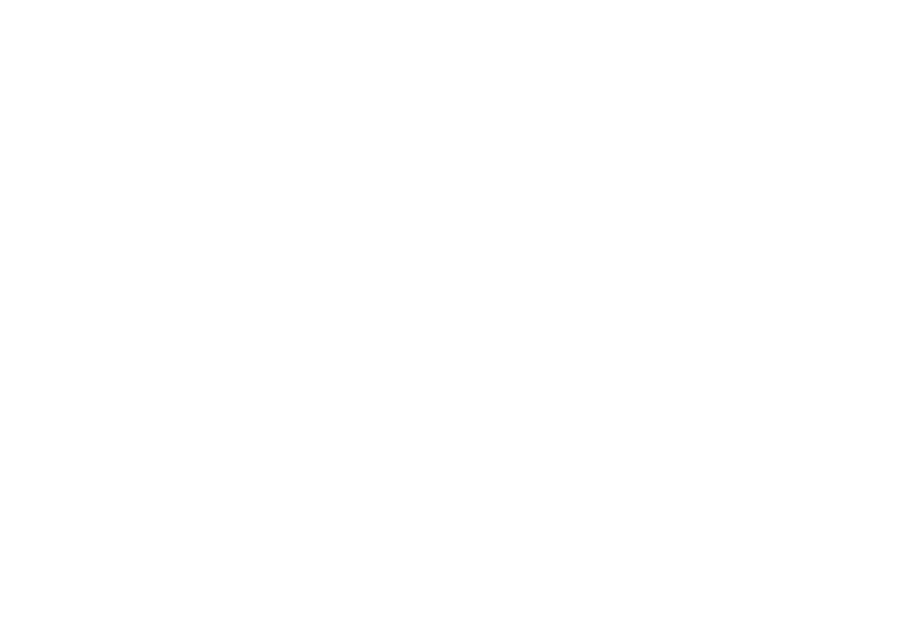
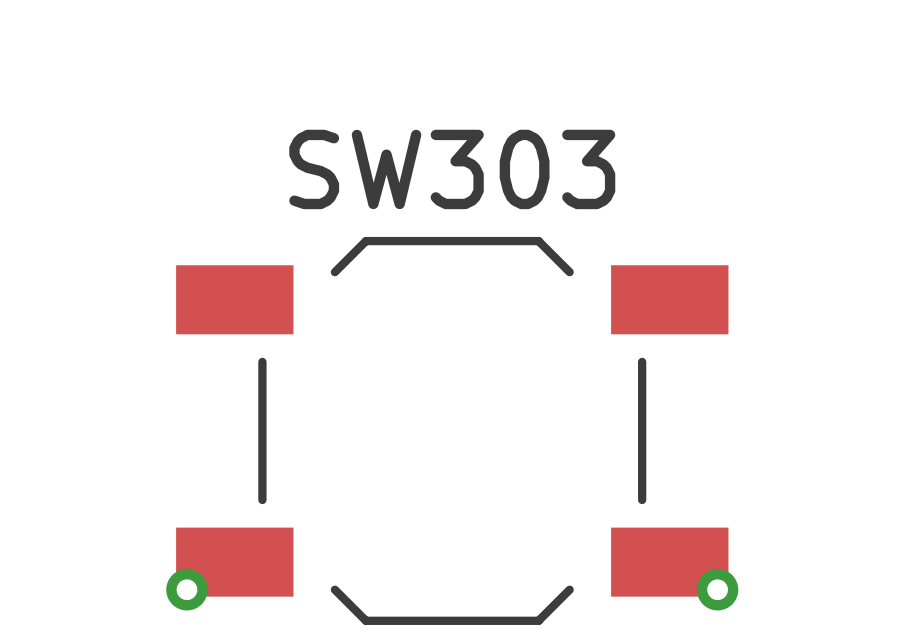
SW303: none -> (452, 430)
via: none -> (186, 589)
via: none -> (717, 589)

